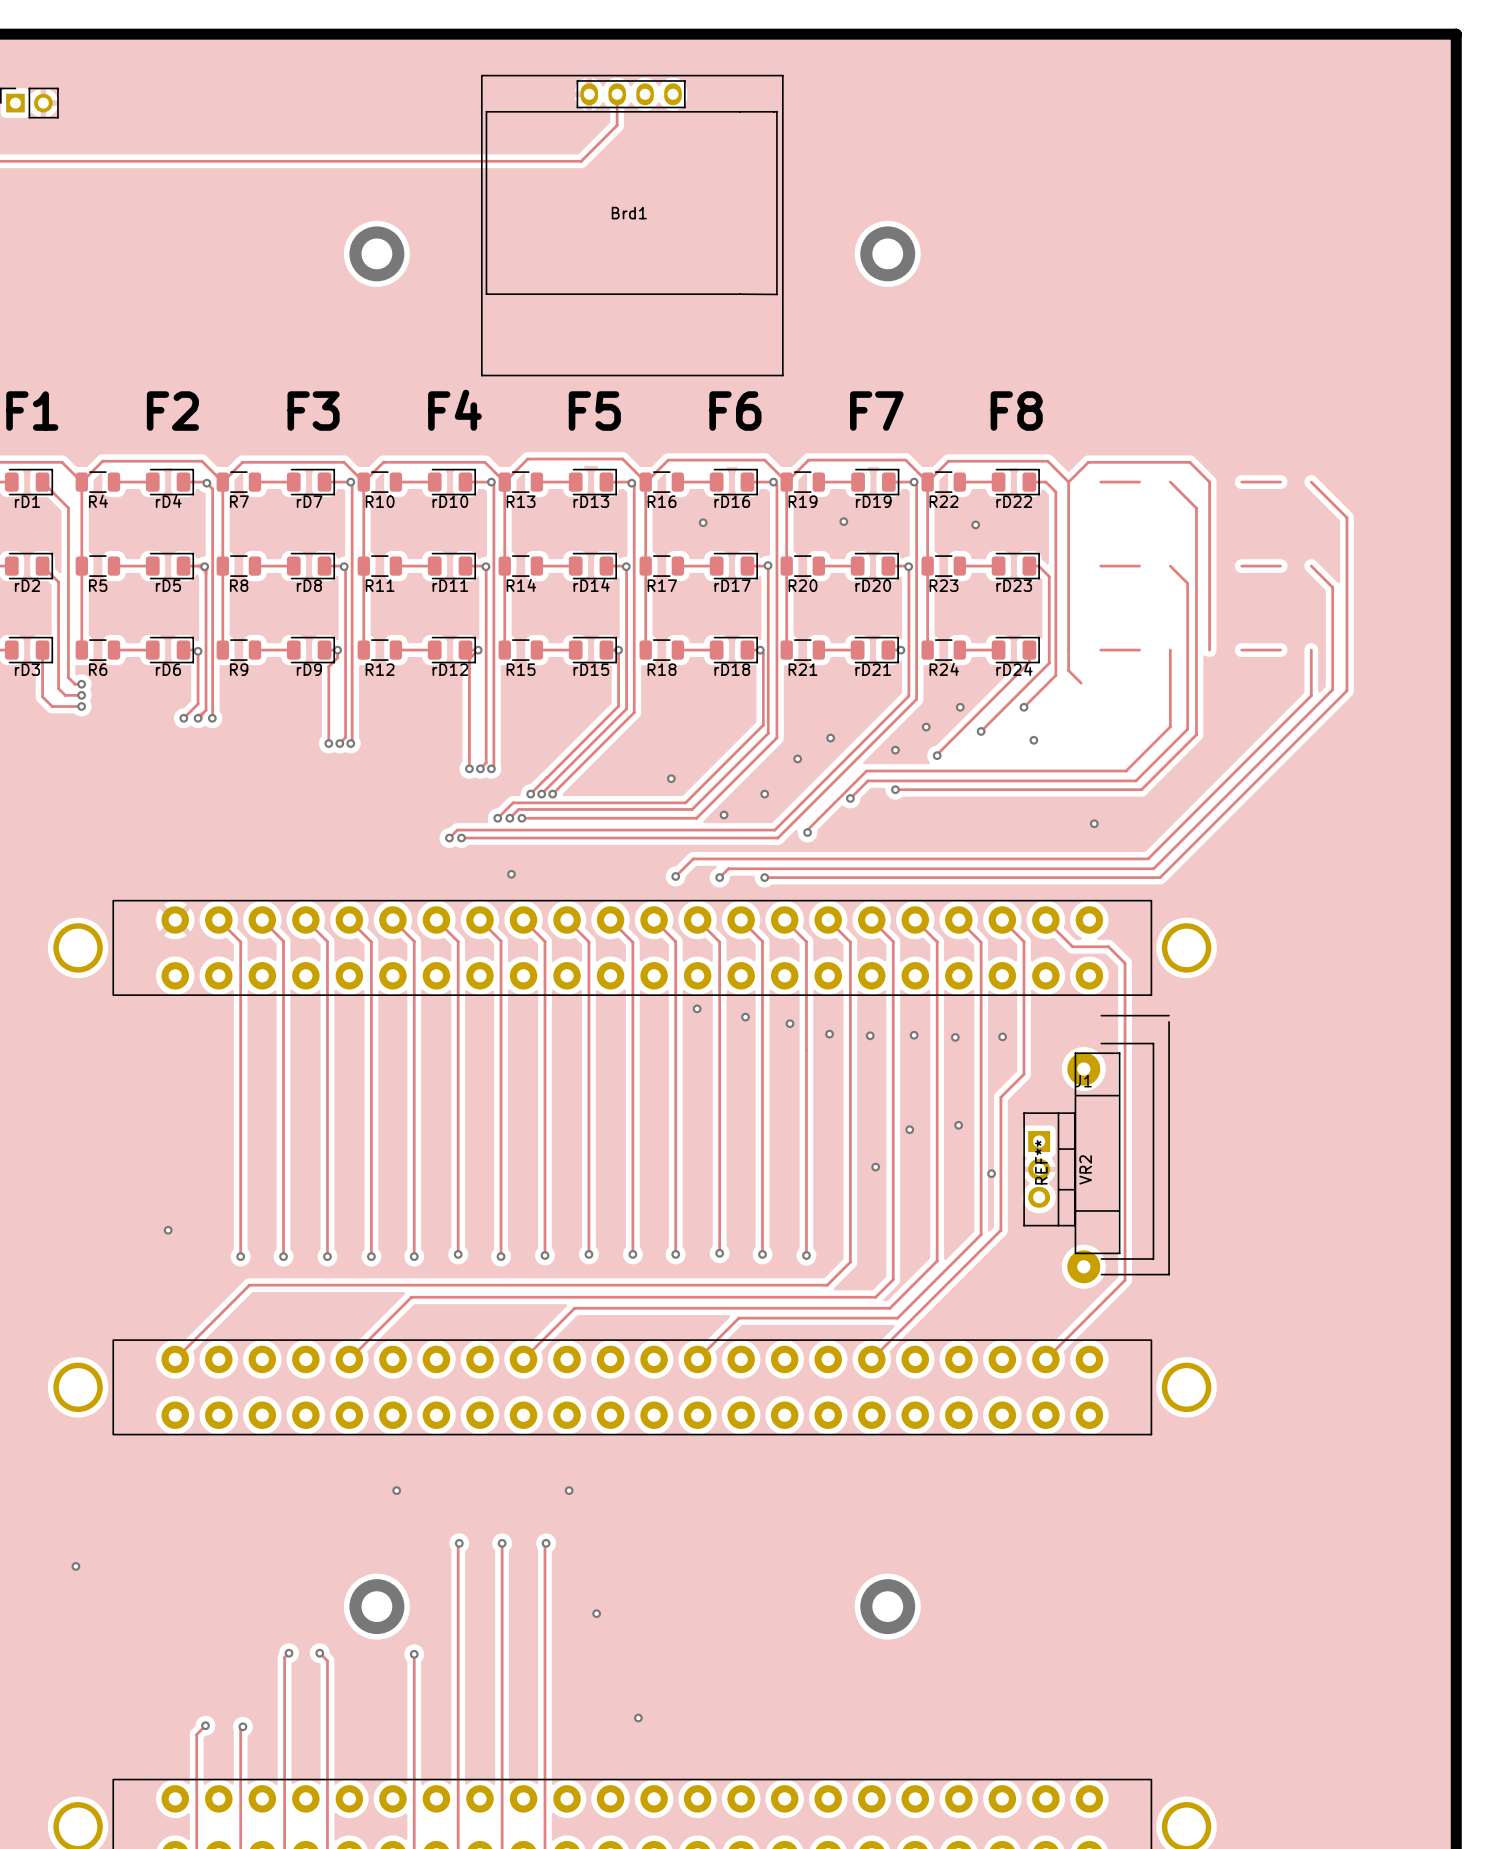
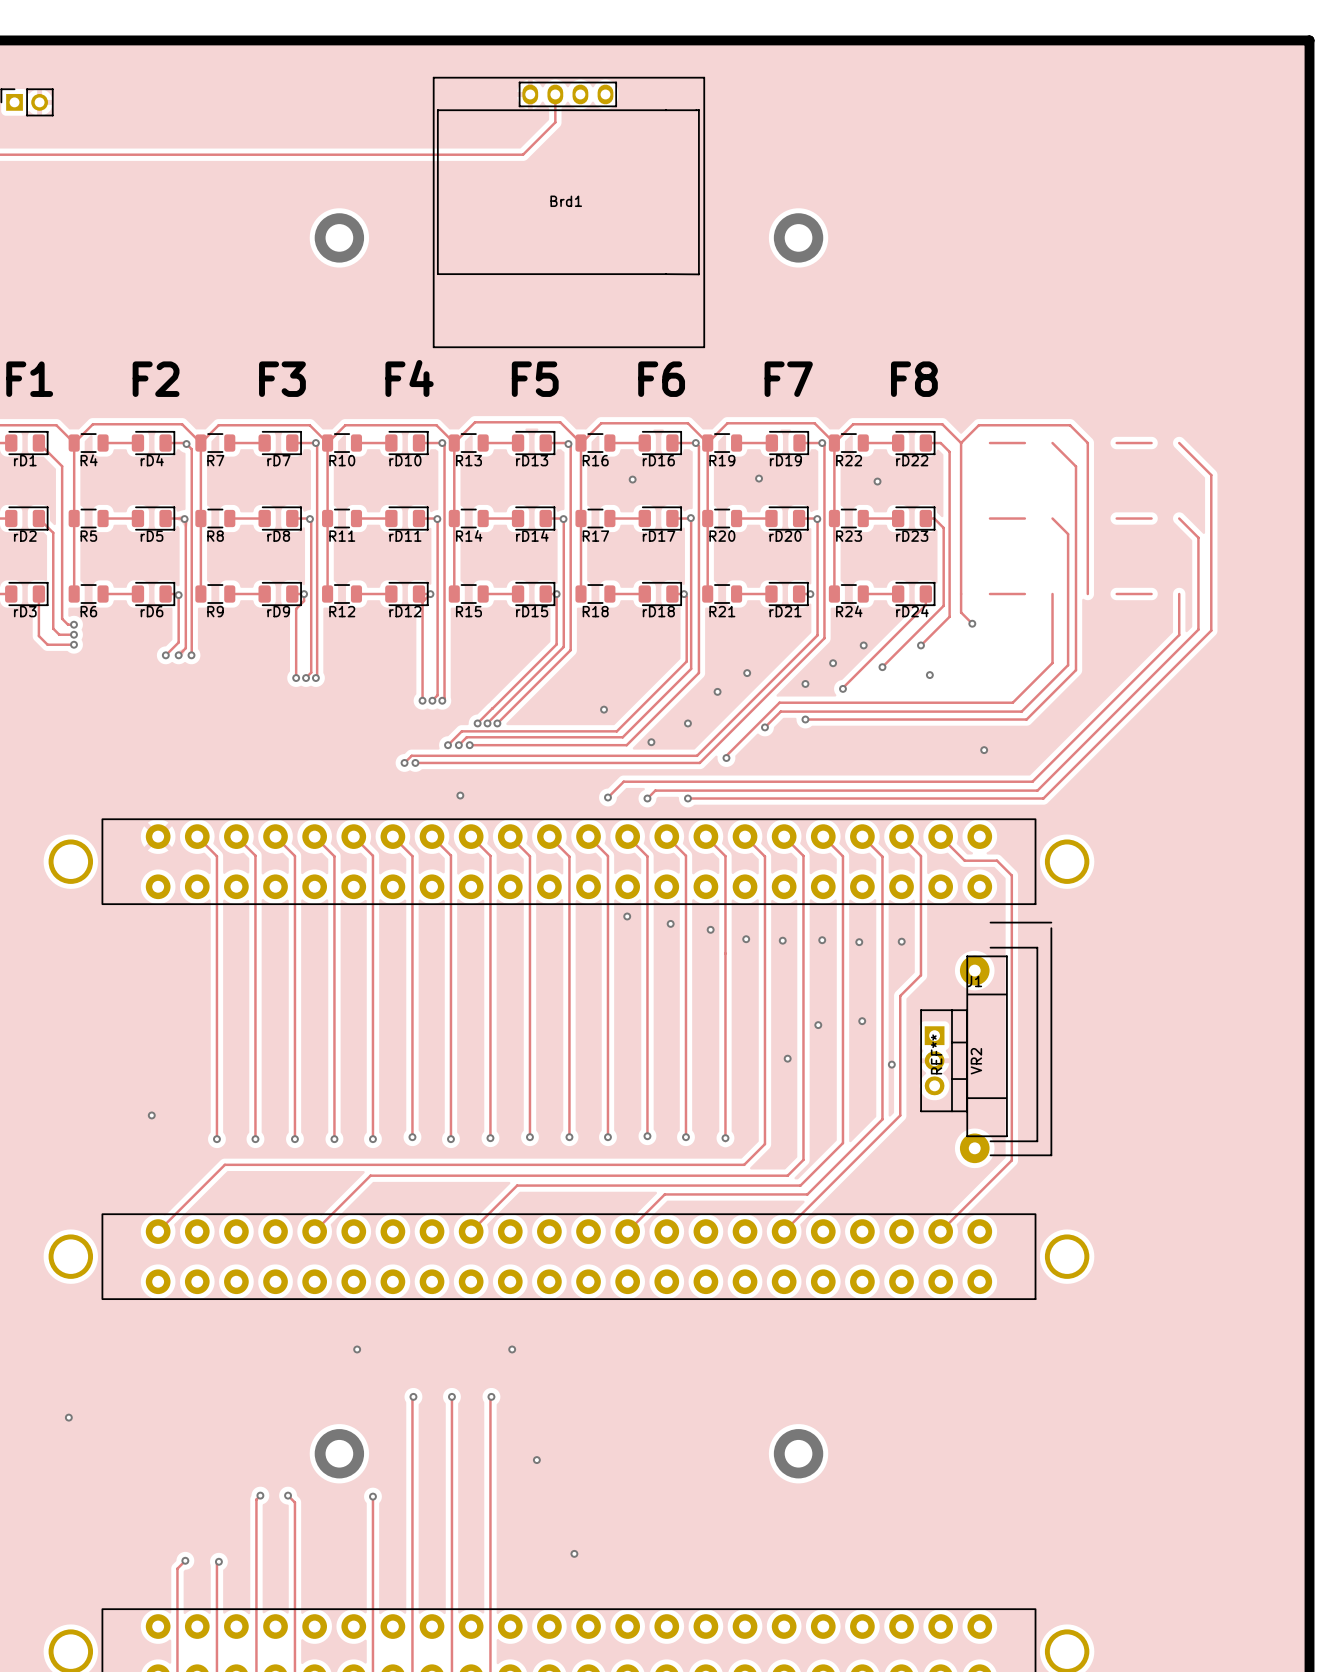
via: none -> (972, 623)

